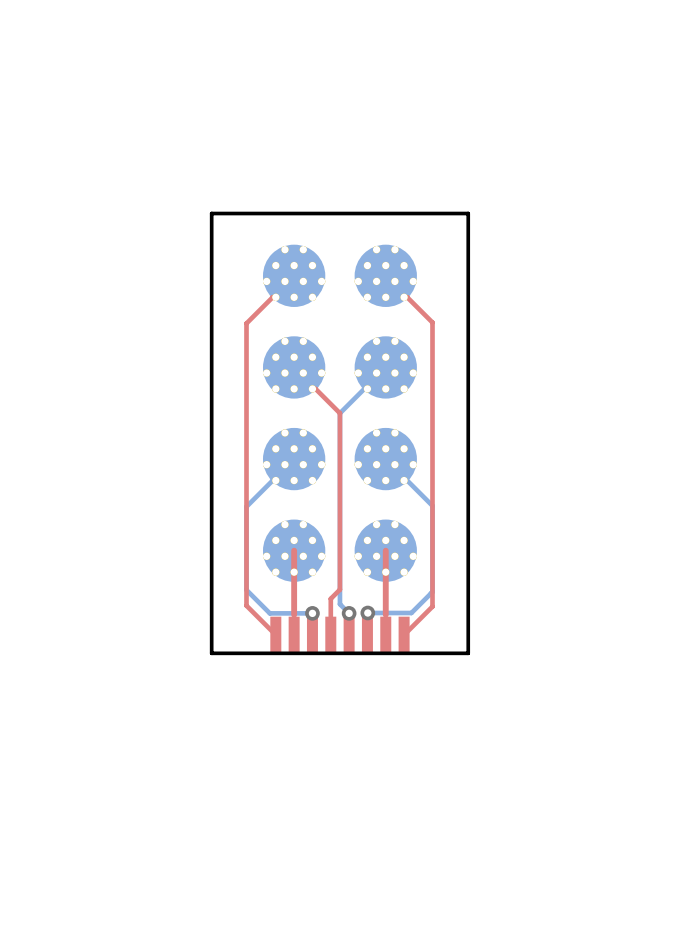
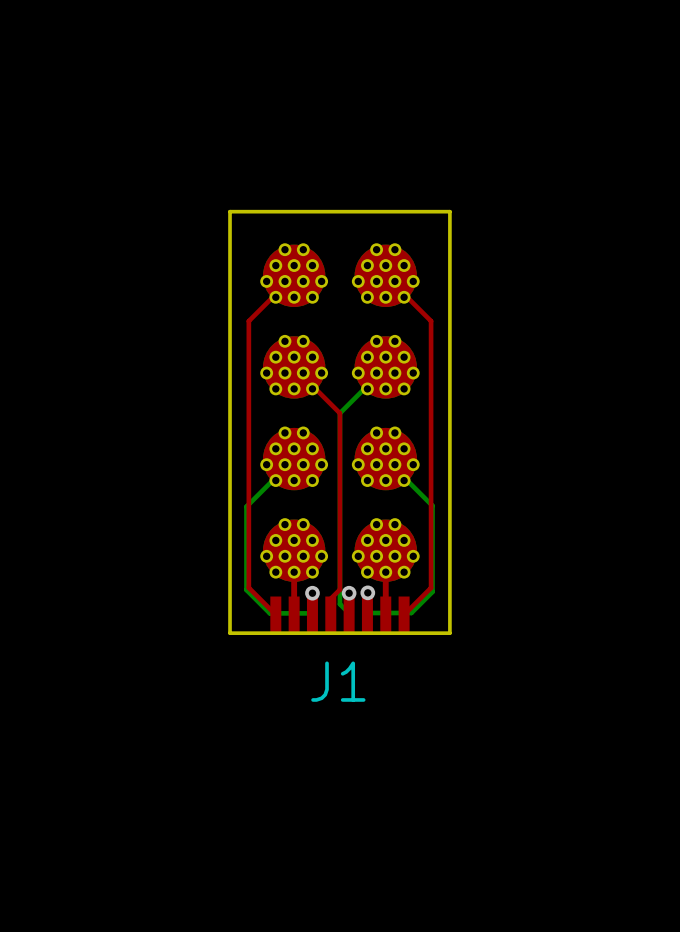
board edge: (211, 213) (468, 213) (468, 653) (211, 653) (211, 213) -> (230, 211) (230, 633) (449, 633) (449, 211) (230, 211)
part footprint: [262, 244, 326, 307] -> [260, 243, 329, 307]
part footprint: [354, 244, 417, 307] -> [351, 243, 420, 307]
top track: (248, 321) (246, 323) (246, 605) (275, 634) -> (248, 321) (248, 587) (275, 614)
top track: (431, 321) (432, 606) (404, 634) -> (431, 321) (431, 587) (404, 614)
part footprint: [262, 336, 326, 399] -> [260, 334, 329, 399]
part footprint: [354, 336, 417, 399] -> [351, 334, 420, 399]
part footprint: [262, 427, 326, 491] -> [260, 426, 329, 491]
part footprint: [354, 427, 417, 491] -> [351, 426, 420, 491]
part footprint: [262, 519, 326, 582] -> [260, 518, 329, 582]
part footprint: [354, 519, 417, 582] -> [351, 518, 420, 582]
via: none -> (367, 592)
via: none -> (349, 593)
via position: (312, 613) -> (312, 593)
via: (349, 613) -> none
via: (367, 613) -> none
J1 position: (339, 634) -> (339, 614)
J1 name: none -> J1 (338, 681)

